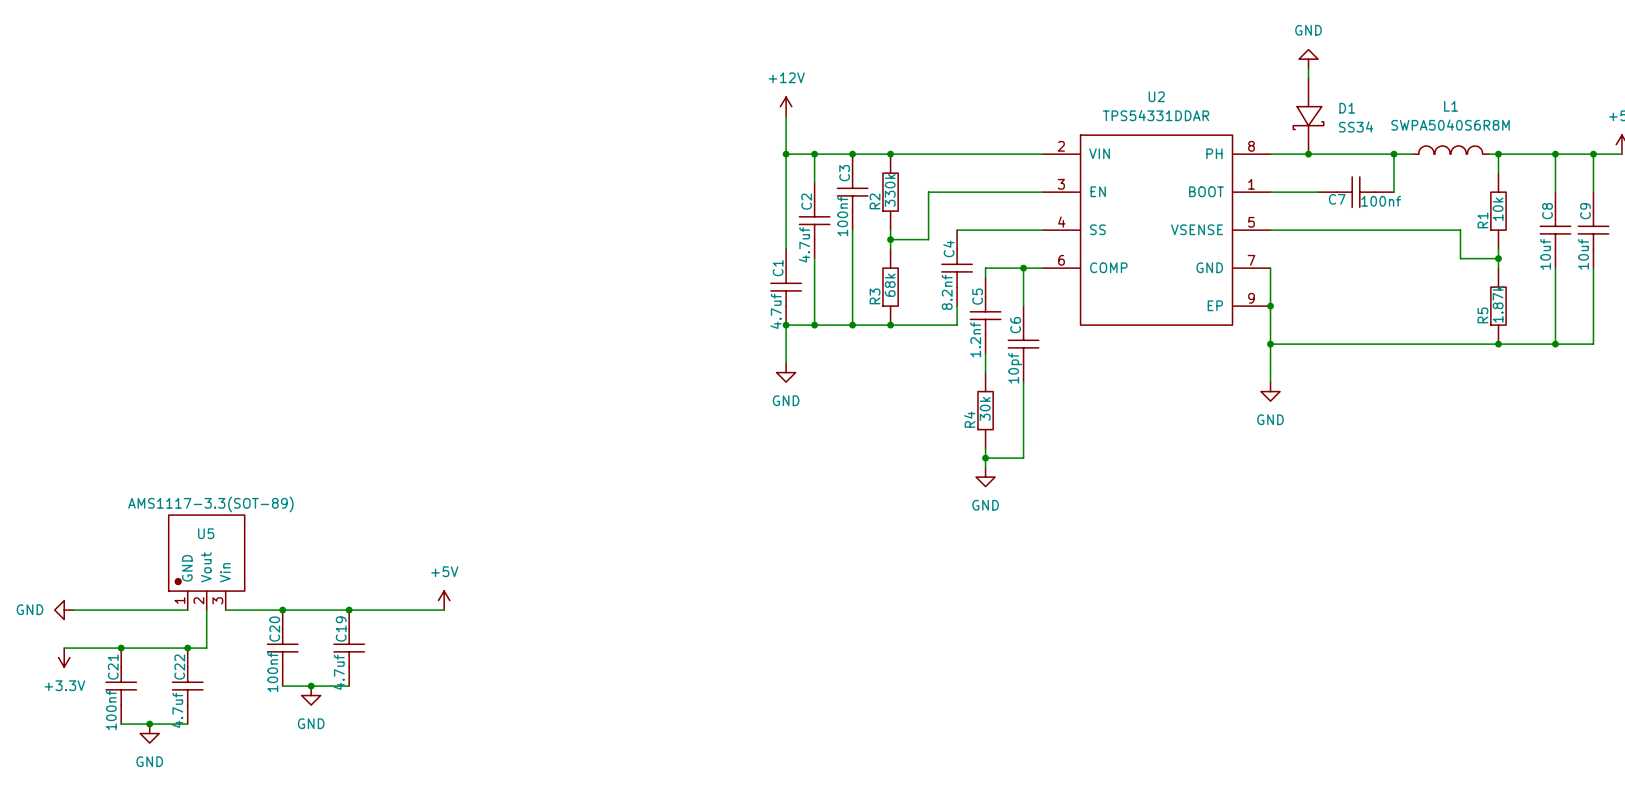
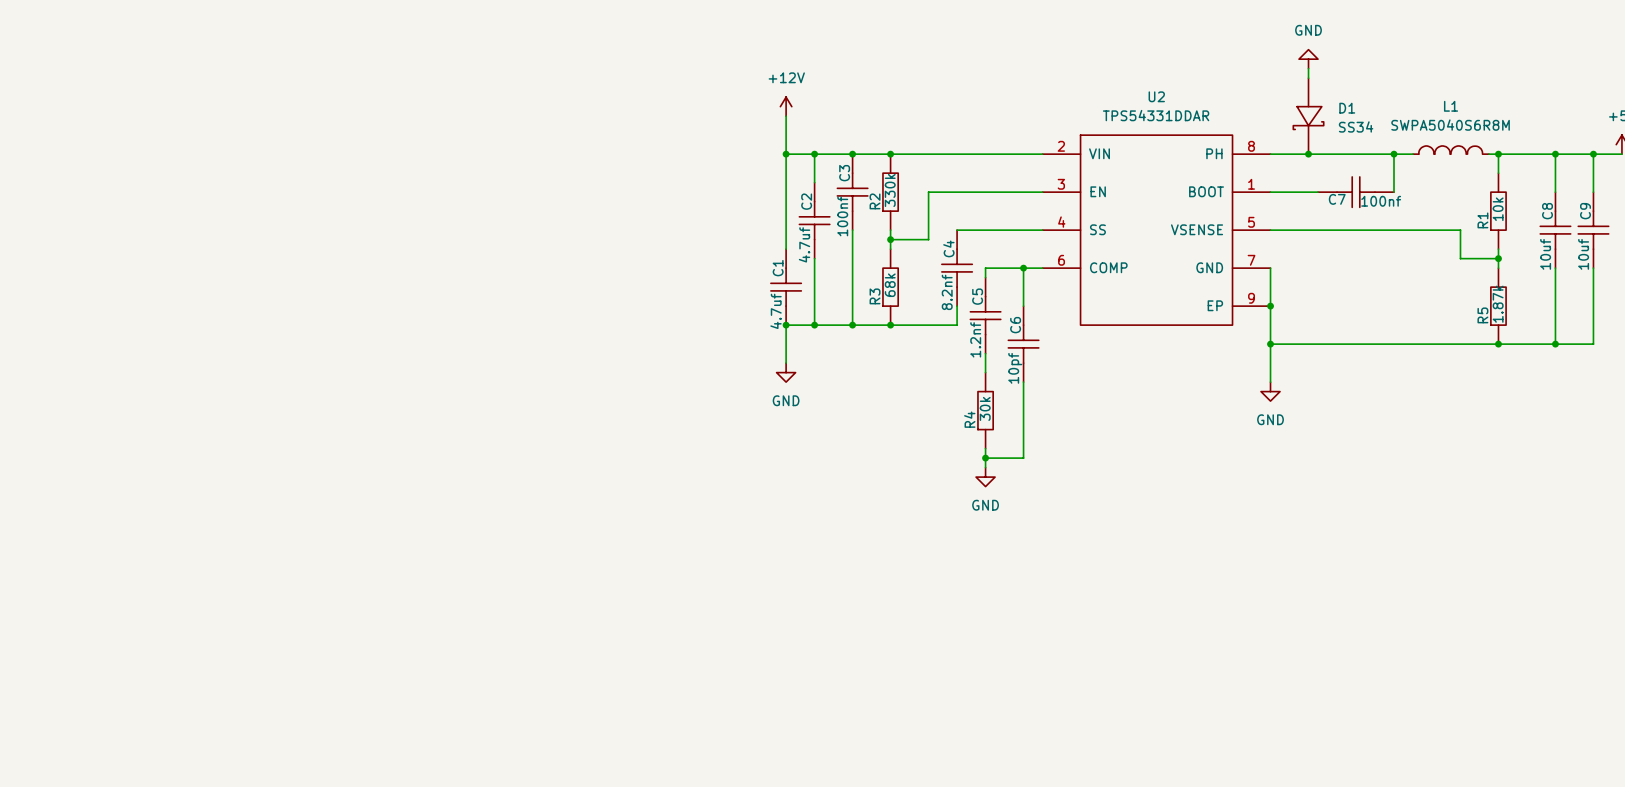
U5: AMS1117-3.3(SOT-89) (206, 562) -> none
power symbol: +5V (444, 600) -> none
power symbol: GND (64, 610) -> none
wire: (73, 610) (187, 610) -> none
wire: (206, 610) (206, 648) (64, 648) -> none
wire: (225, 610) (444, 610) -> none
junction: (282, 610) -> none
junction: (349, 610) -> none
junction: (121, 648) -> none
junction: (187, 648) -> none
C20: 100nf (282, 648) -> none
C19: 4.7uf (349, 648) -> none
power symbol: +3.3V (64, 657) -> none
C21: 100nf (121, 686) -> none
C22: 4.7uf (187, 686) -> none
wire: (282, 686) (349, 686) -> none
junction: (311, 686) -> none
power symbol: GND (311, 695) -> none
wire: (121, 724) (187, 724) -> none
junction: (149, 724) -> none
power symbol: GND (149, 733) -> none

